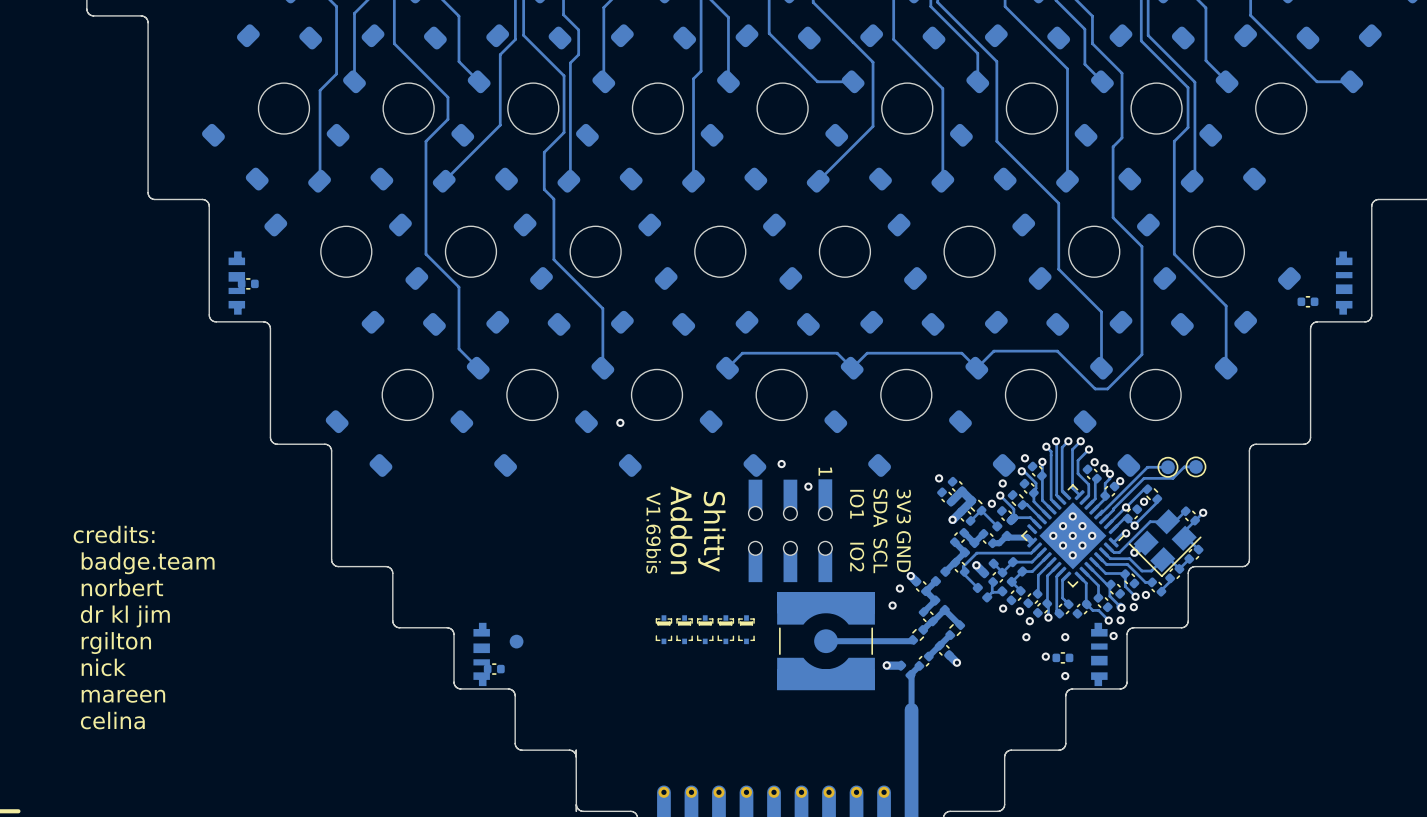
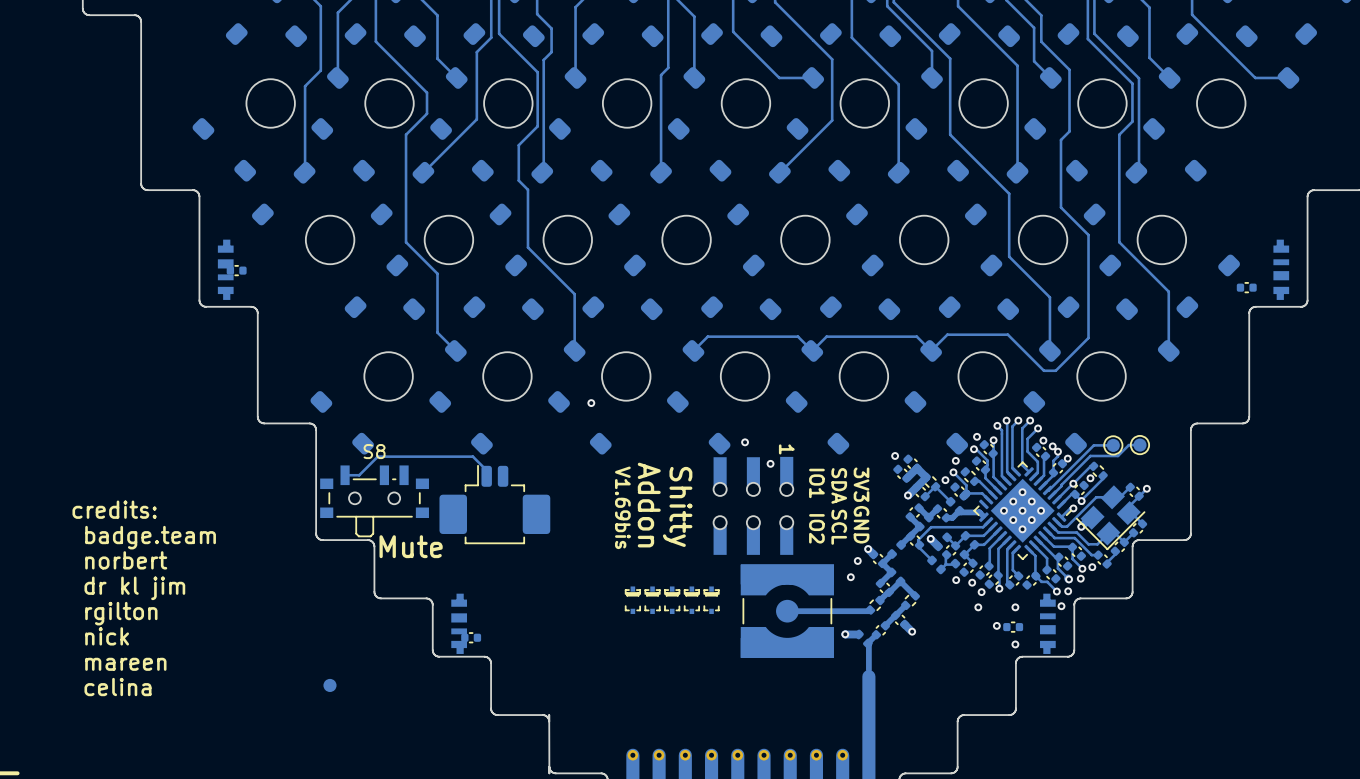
track: none -> (345, 475) (359, 475) (377, 456) (472, 456) (486, 470) (486, 476)
S8: none -> (374, 501)
part: none -> (494, 504)
text: none -> Mute (411, 546)
part position: (516, 641) -> (329, 685)

